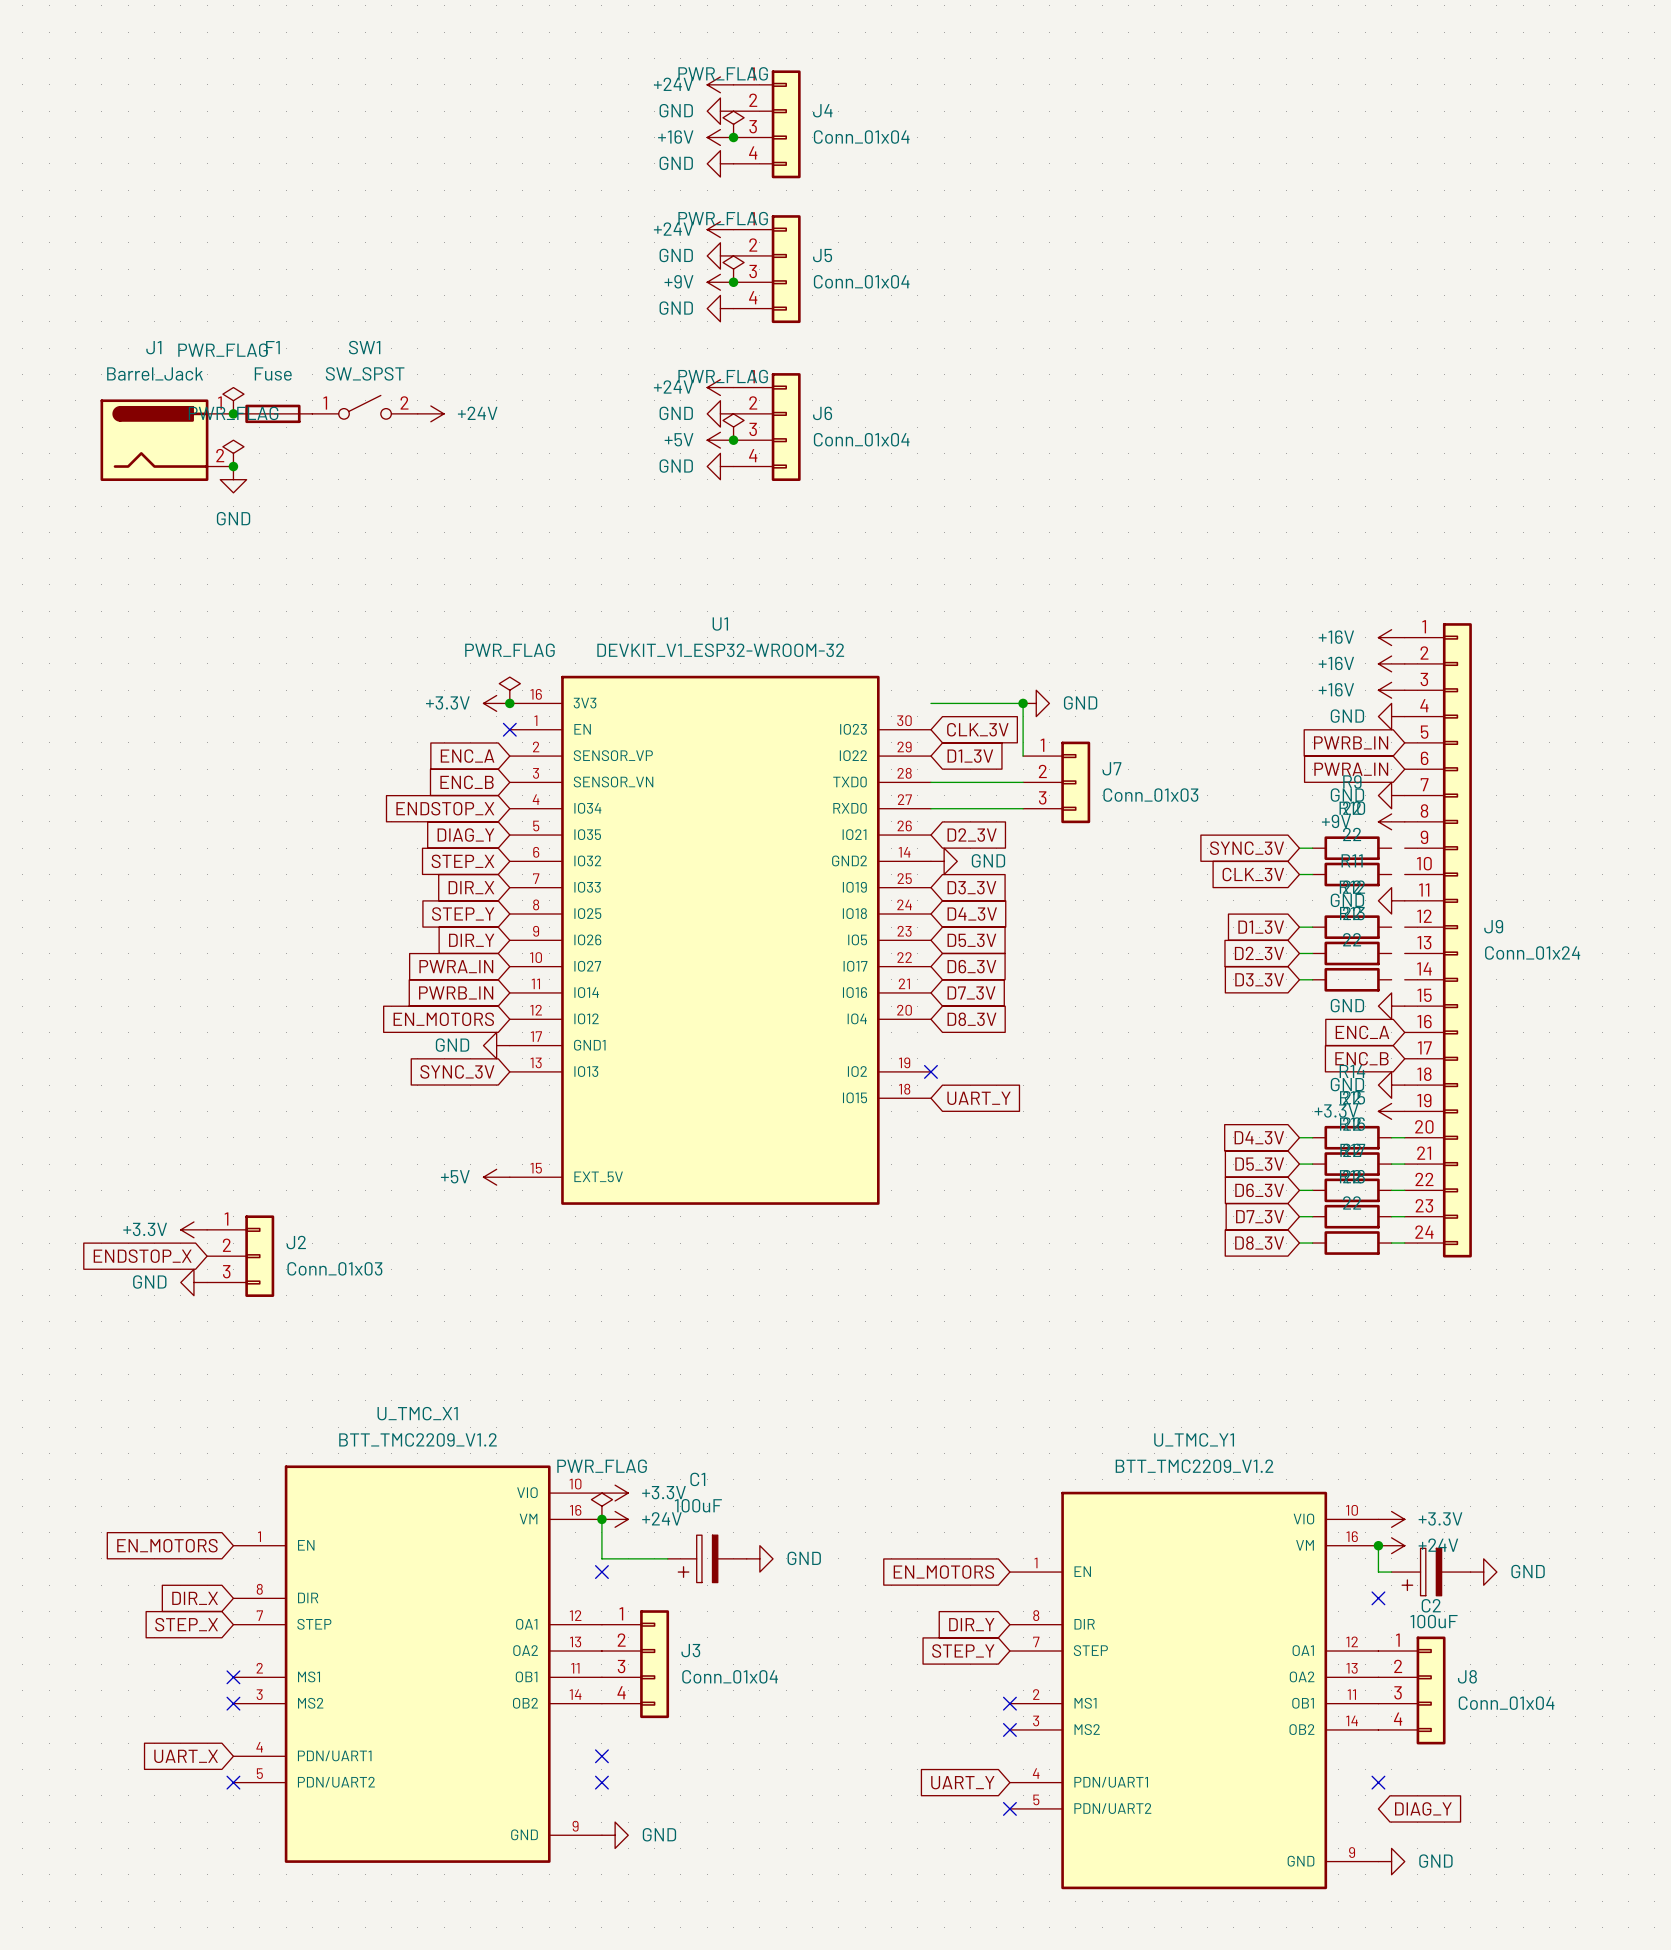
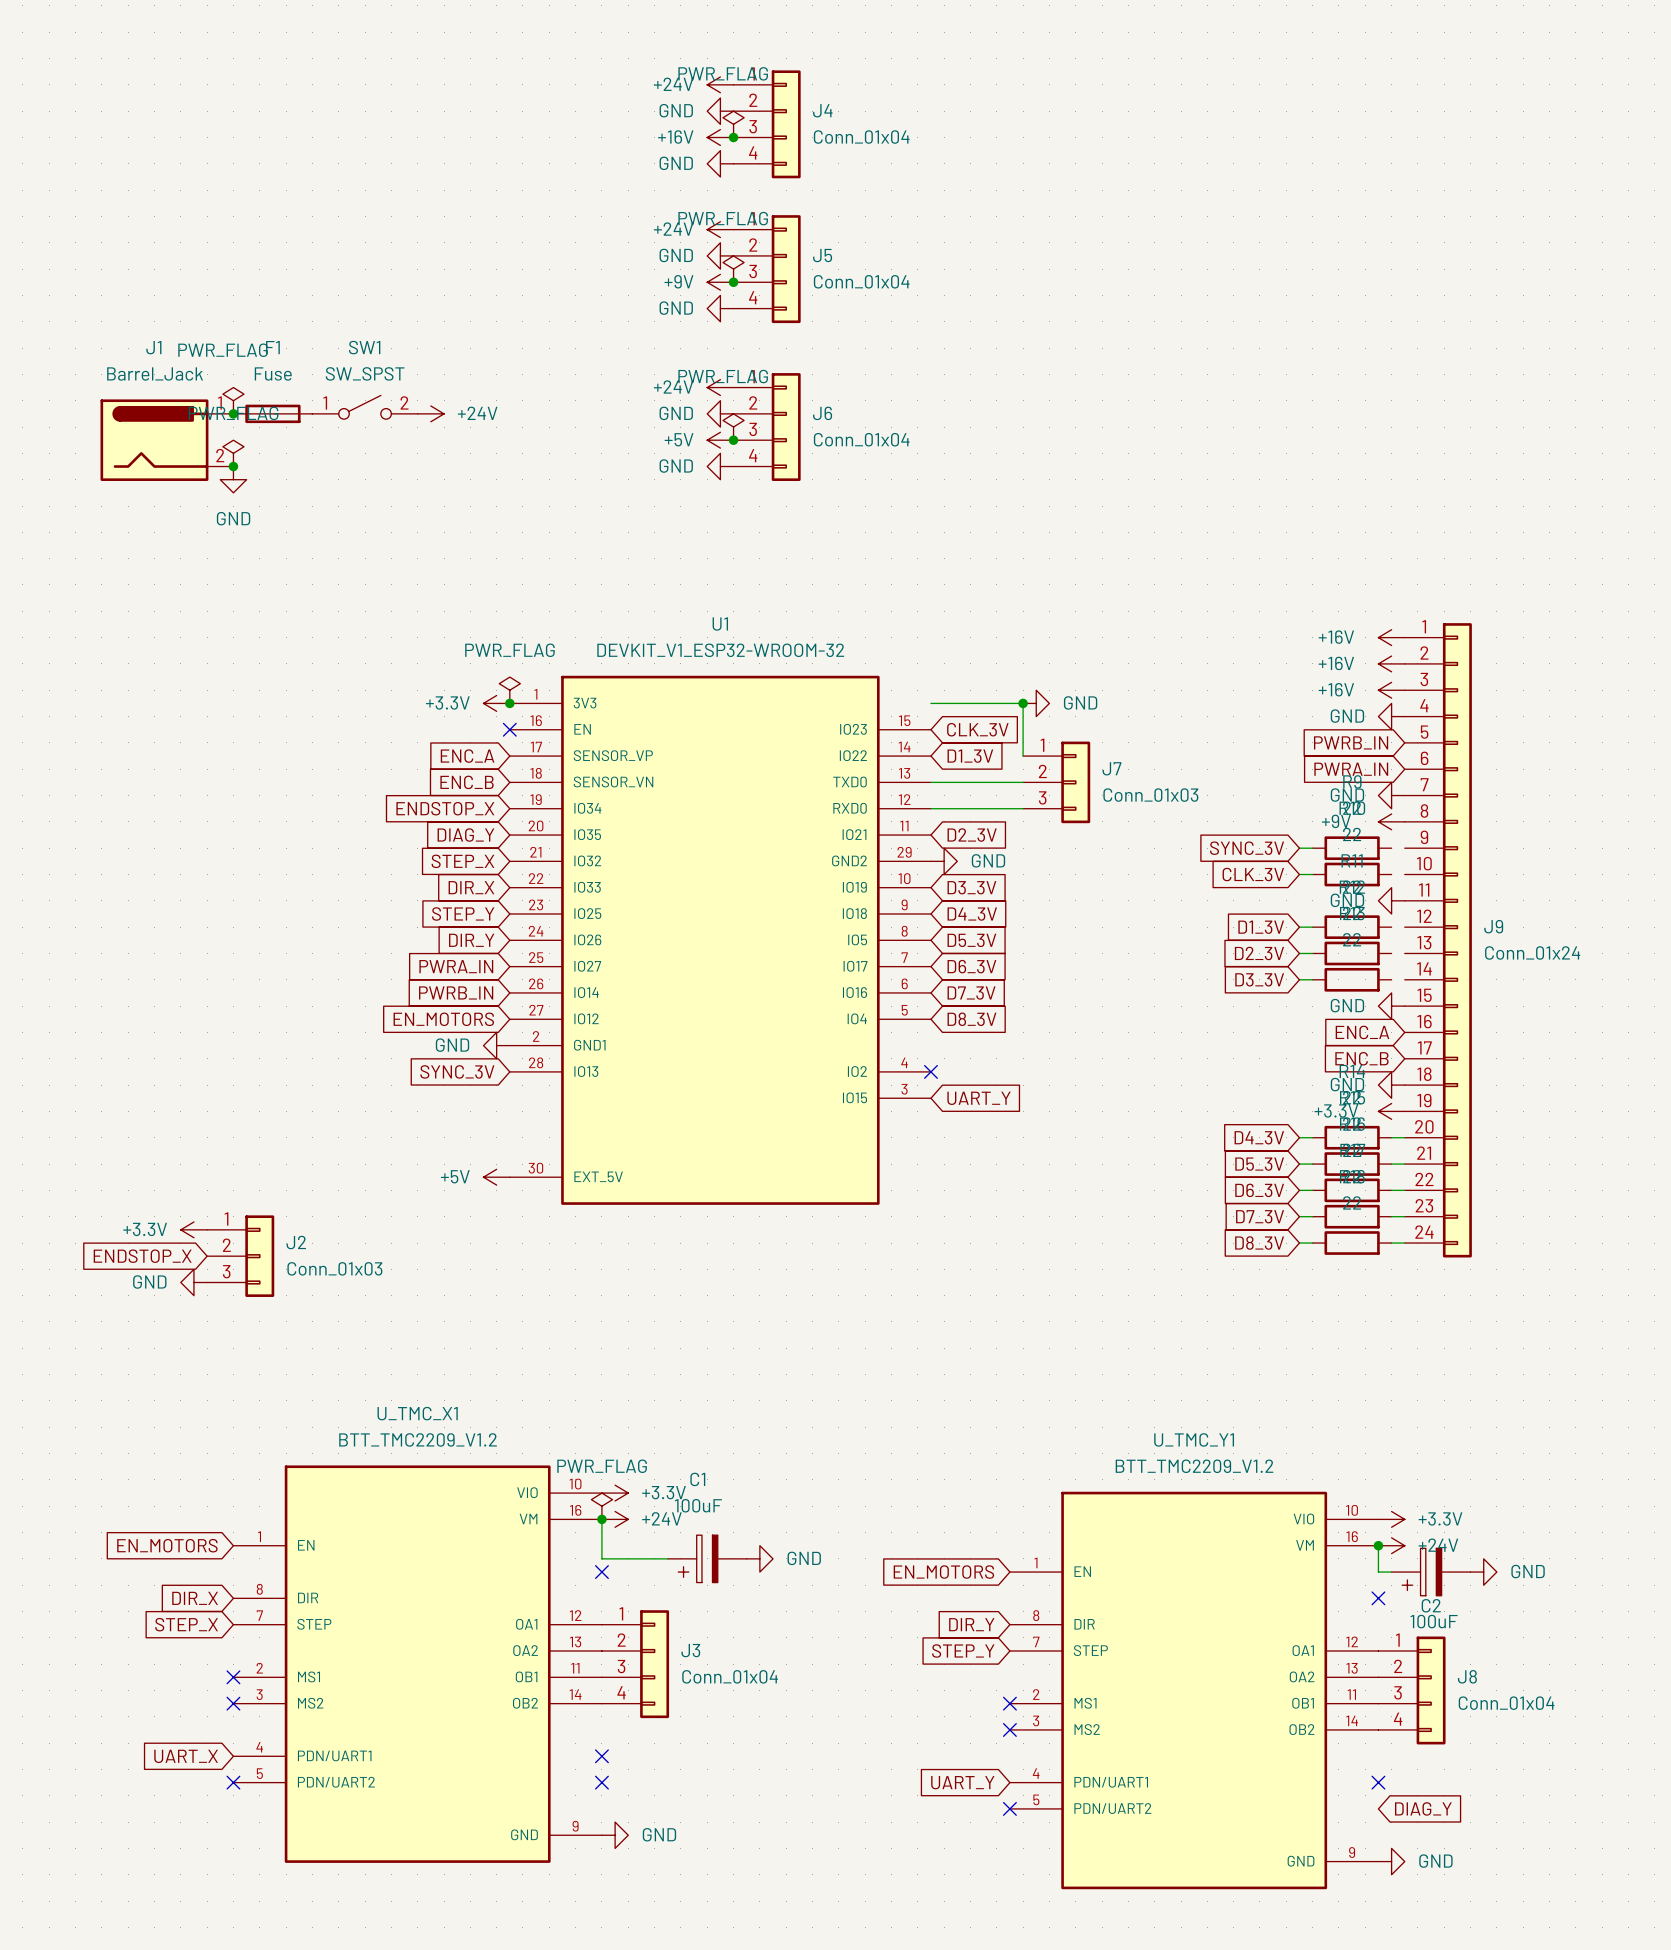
U1 symbol: [509, 675, 931, 1205] -> [509, 675, 931, 1205]

